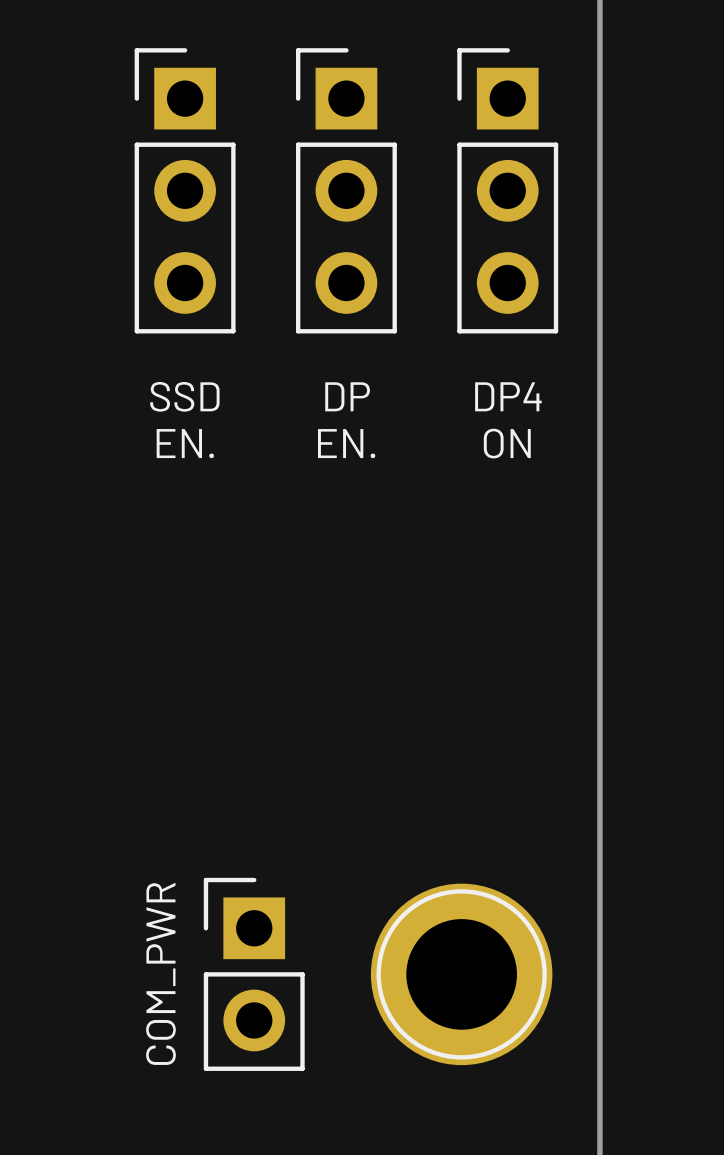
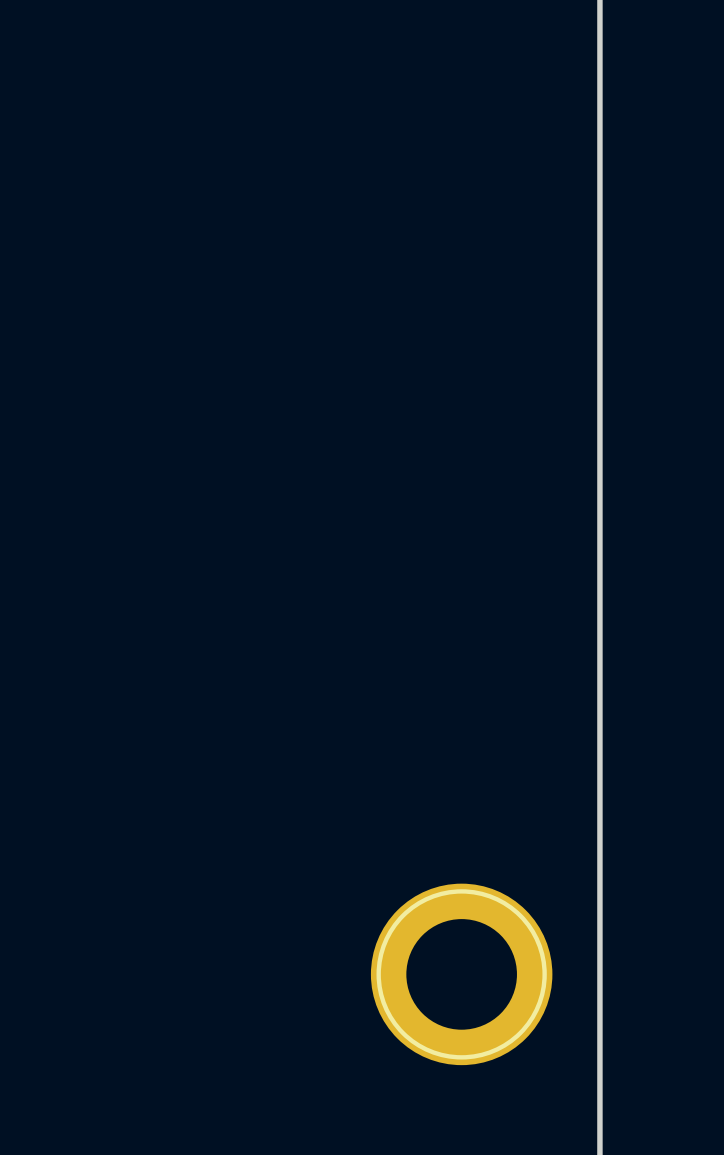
part: (185, 190) -> none
part: (346, 190) -> none
part: (507, 190) -> none
text: SSD (184, 396) -> none
text: DP (347, 396) -> none
text: DP4 (508, 396) -> none
text: EN. (185, 443) -> none
text: EN. (346, 443) -> none
text: ON (507, 443) -> none
part: COM_PWR (254, 974) -> none

